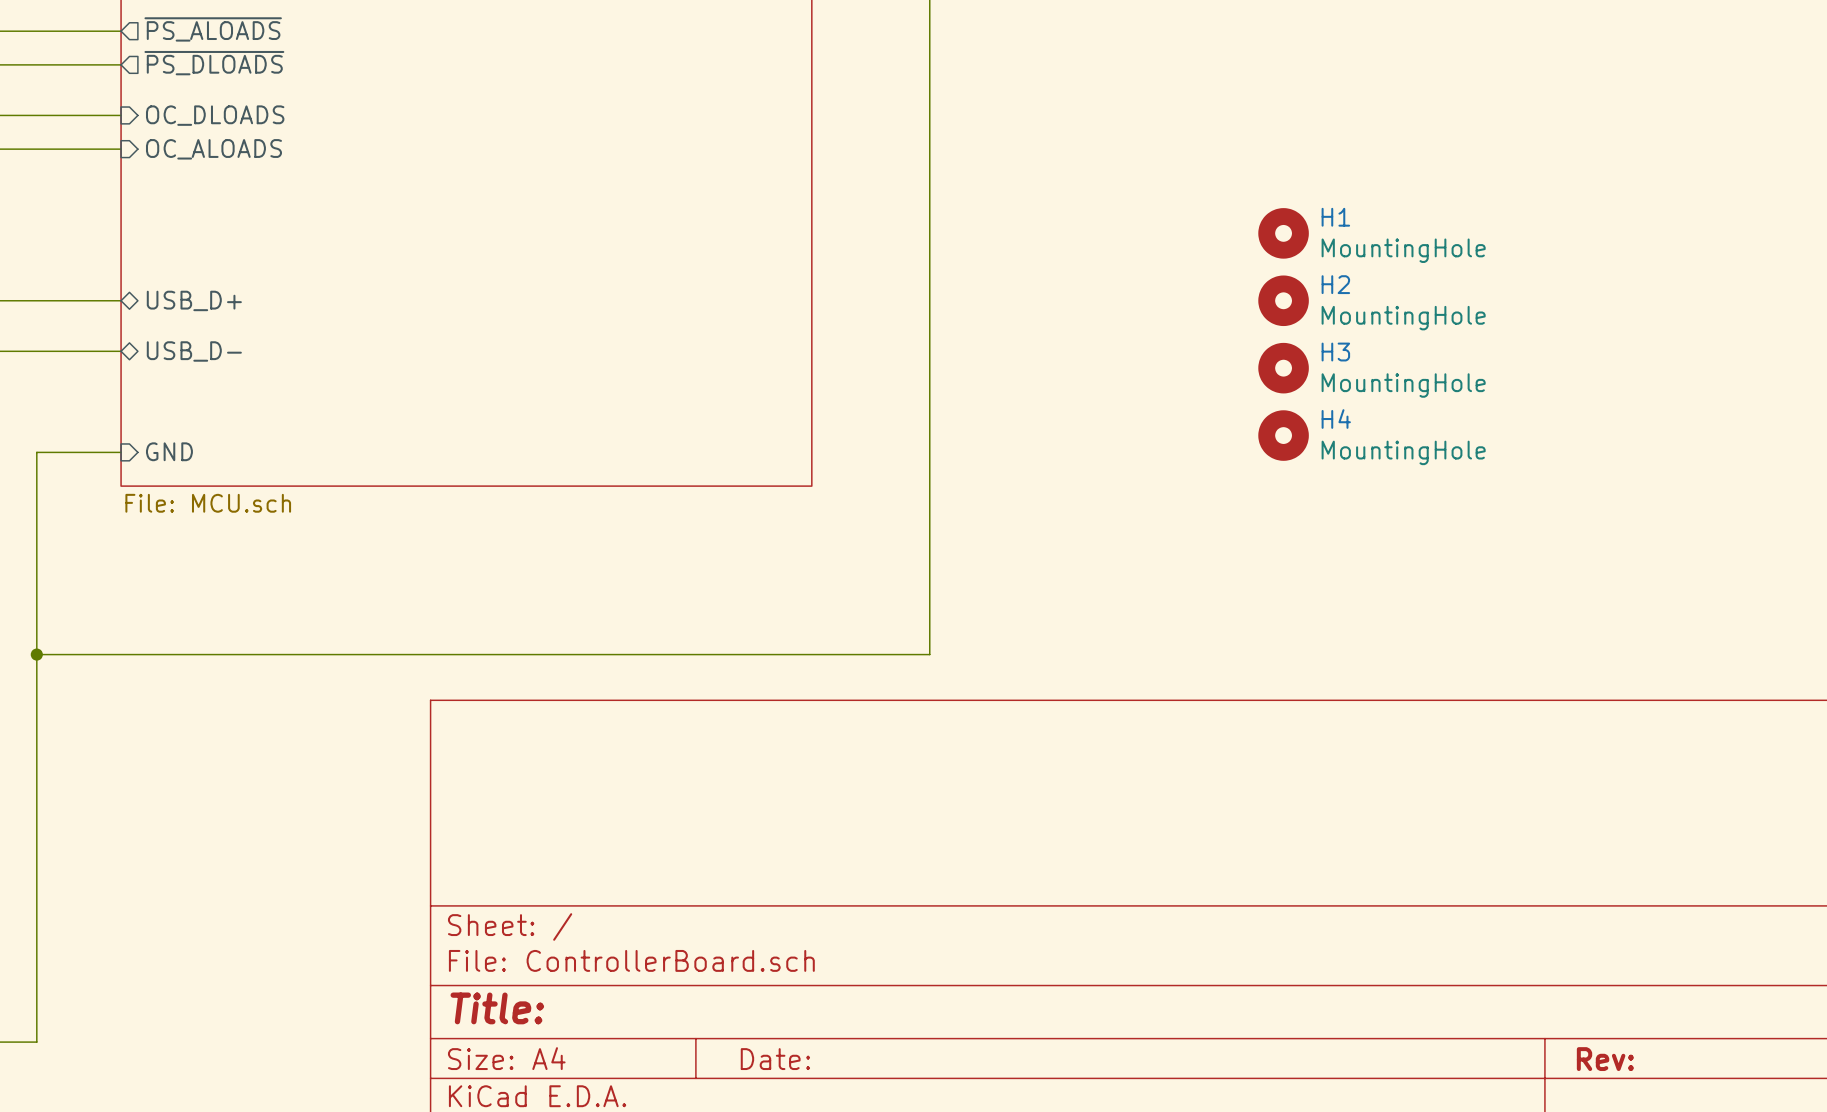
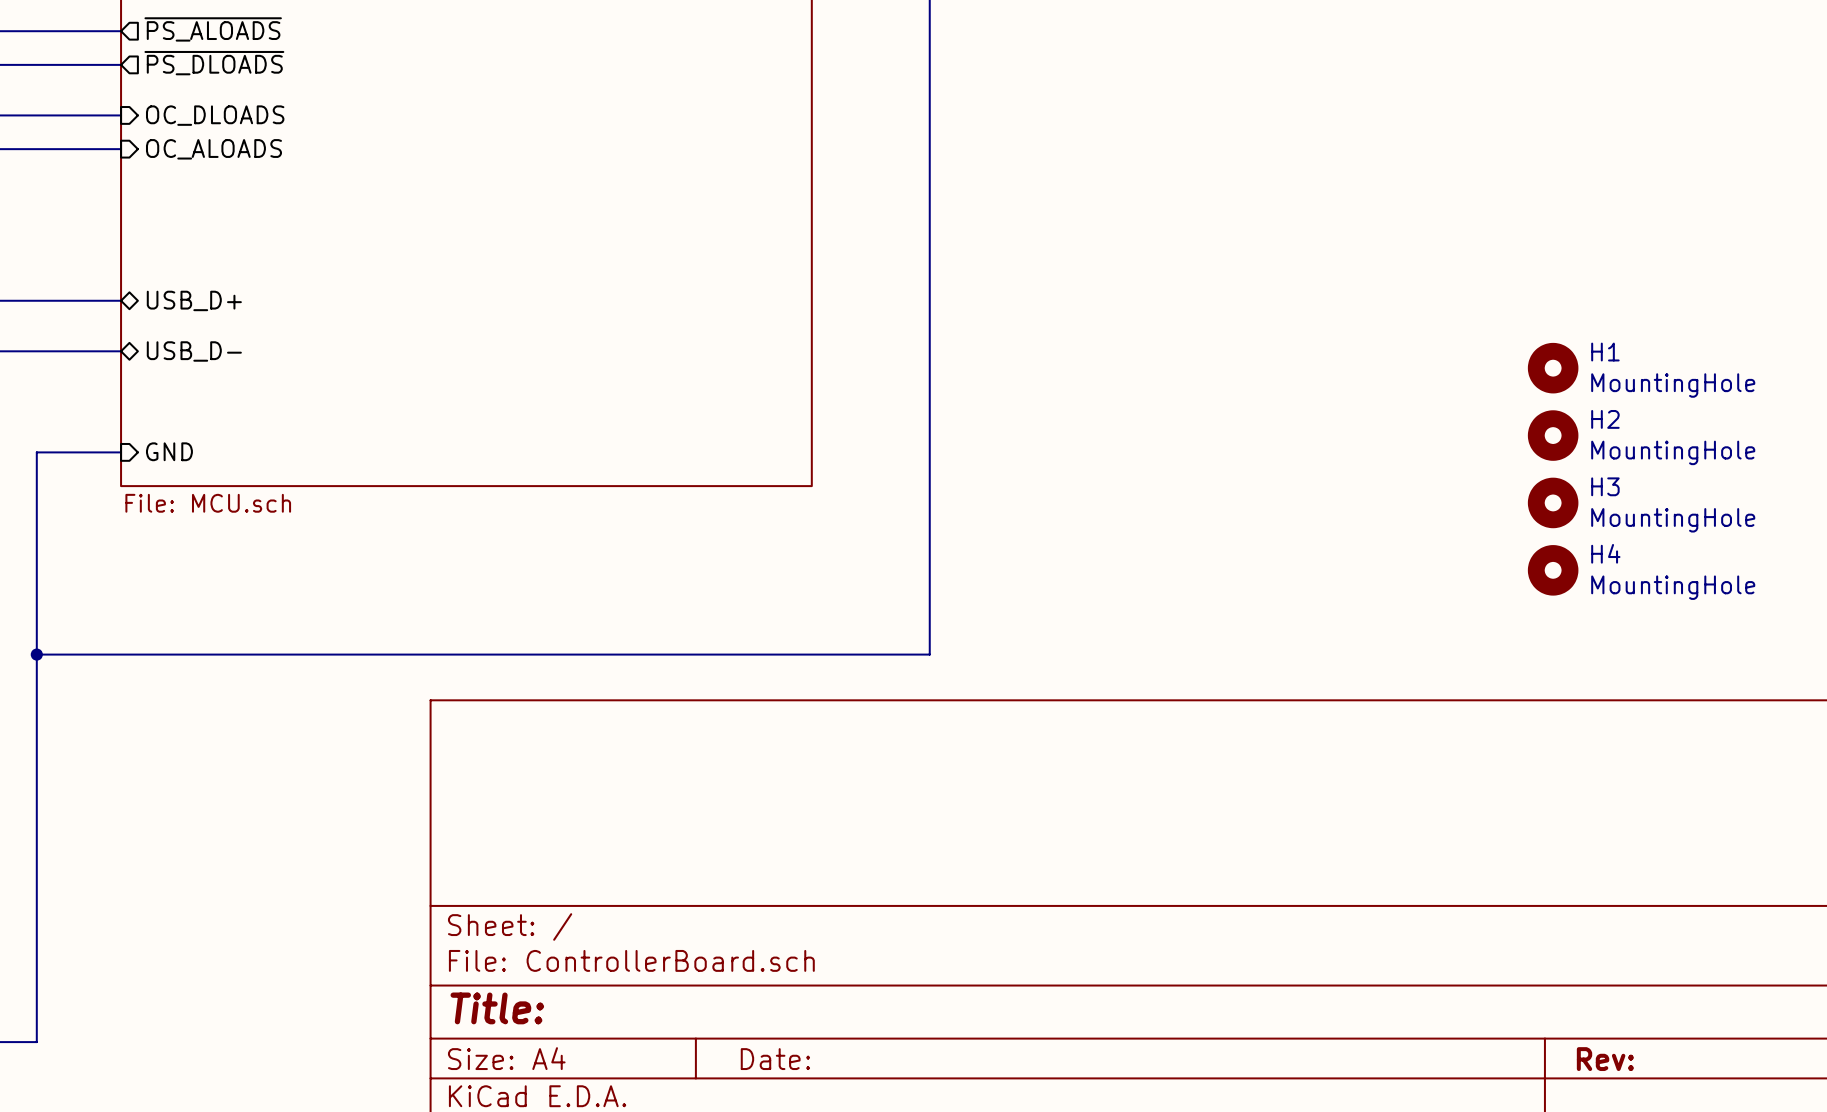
H1 position: (1283, 233) -> (1553, 368)
H2 position: (1283, 300) -> (1553, 435)
H3 position: (1283, 368) -> (1553, 502)
H4 position: (1283, 435) -> (1553, 570)

